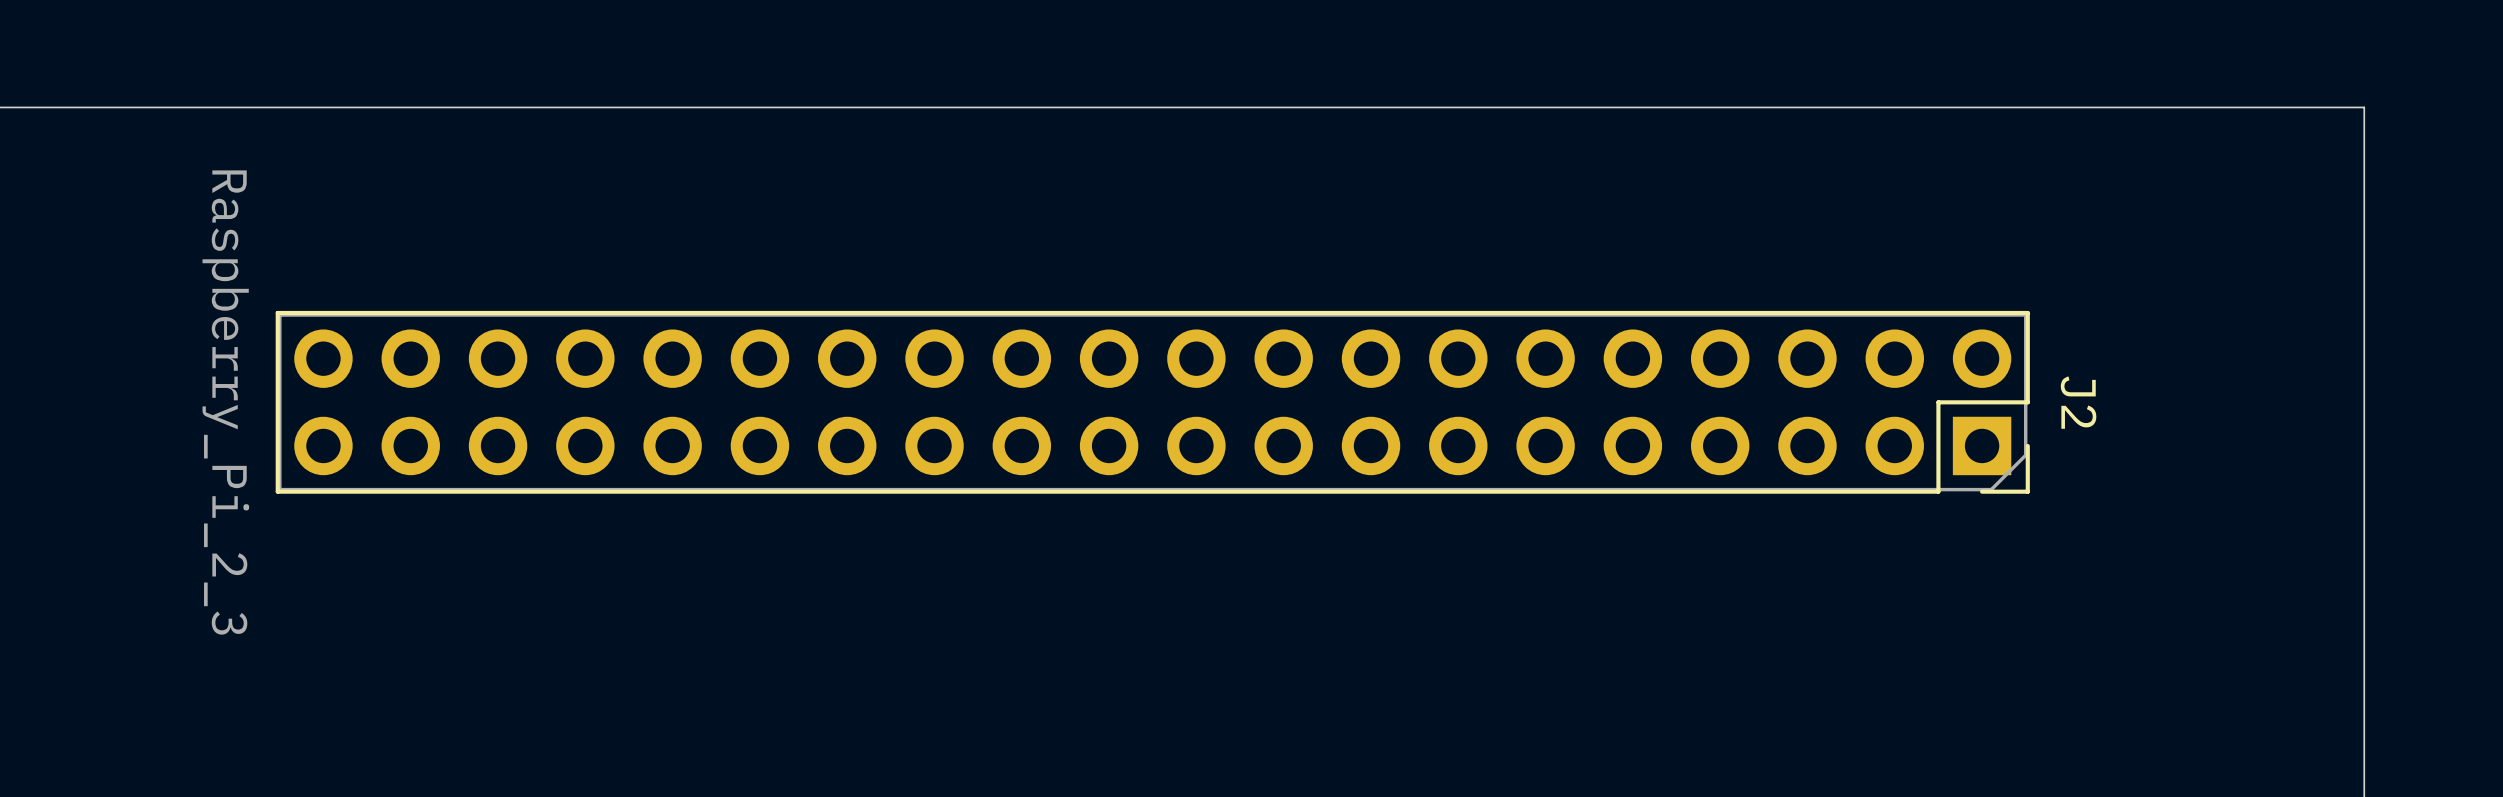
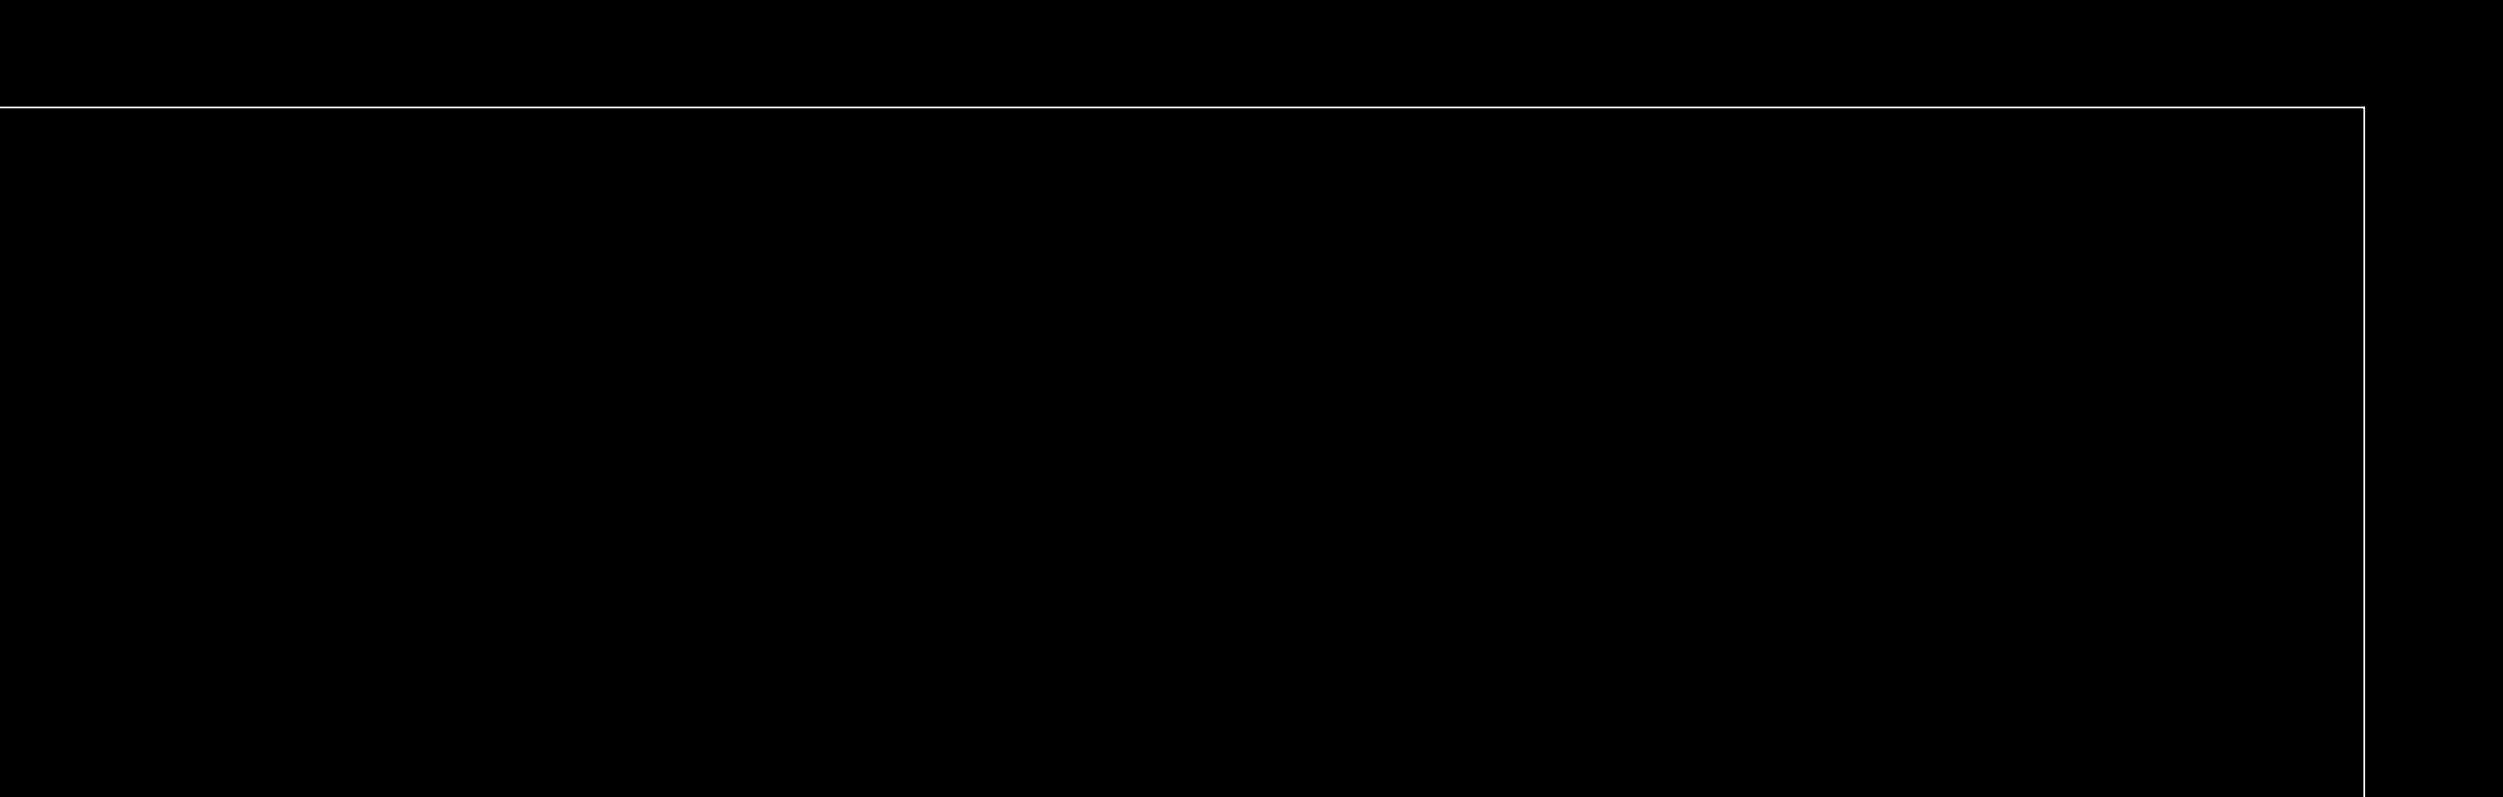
J2: Raspberry_Pi_2_3 (1152, 402) -> none

